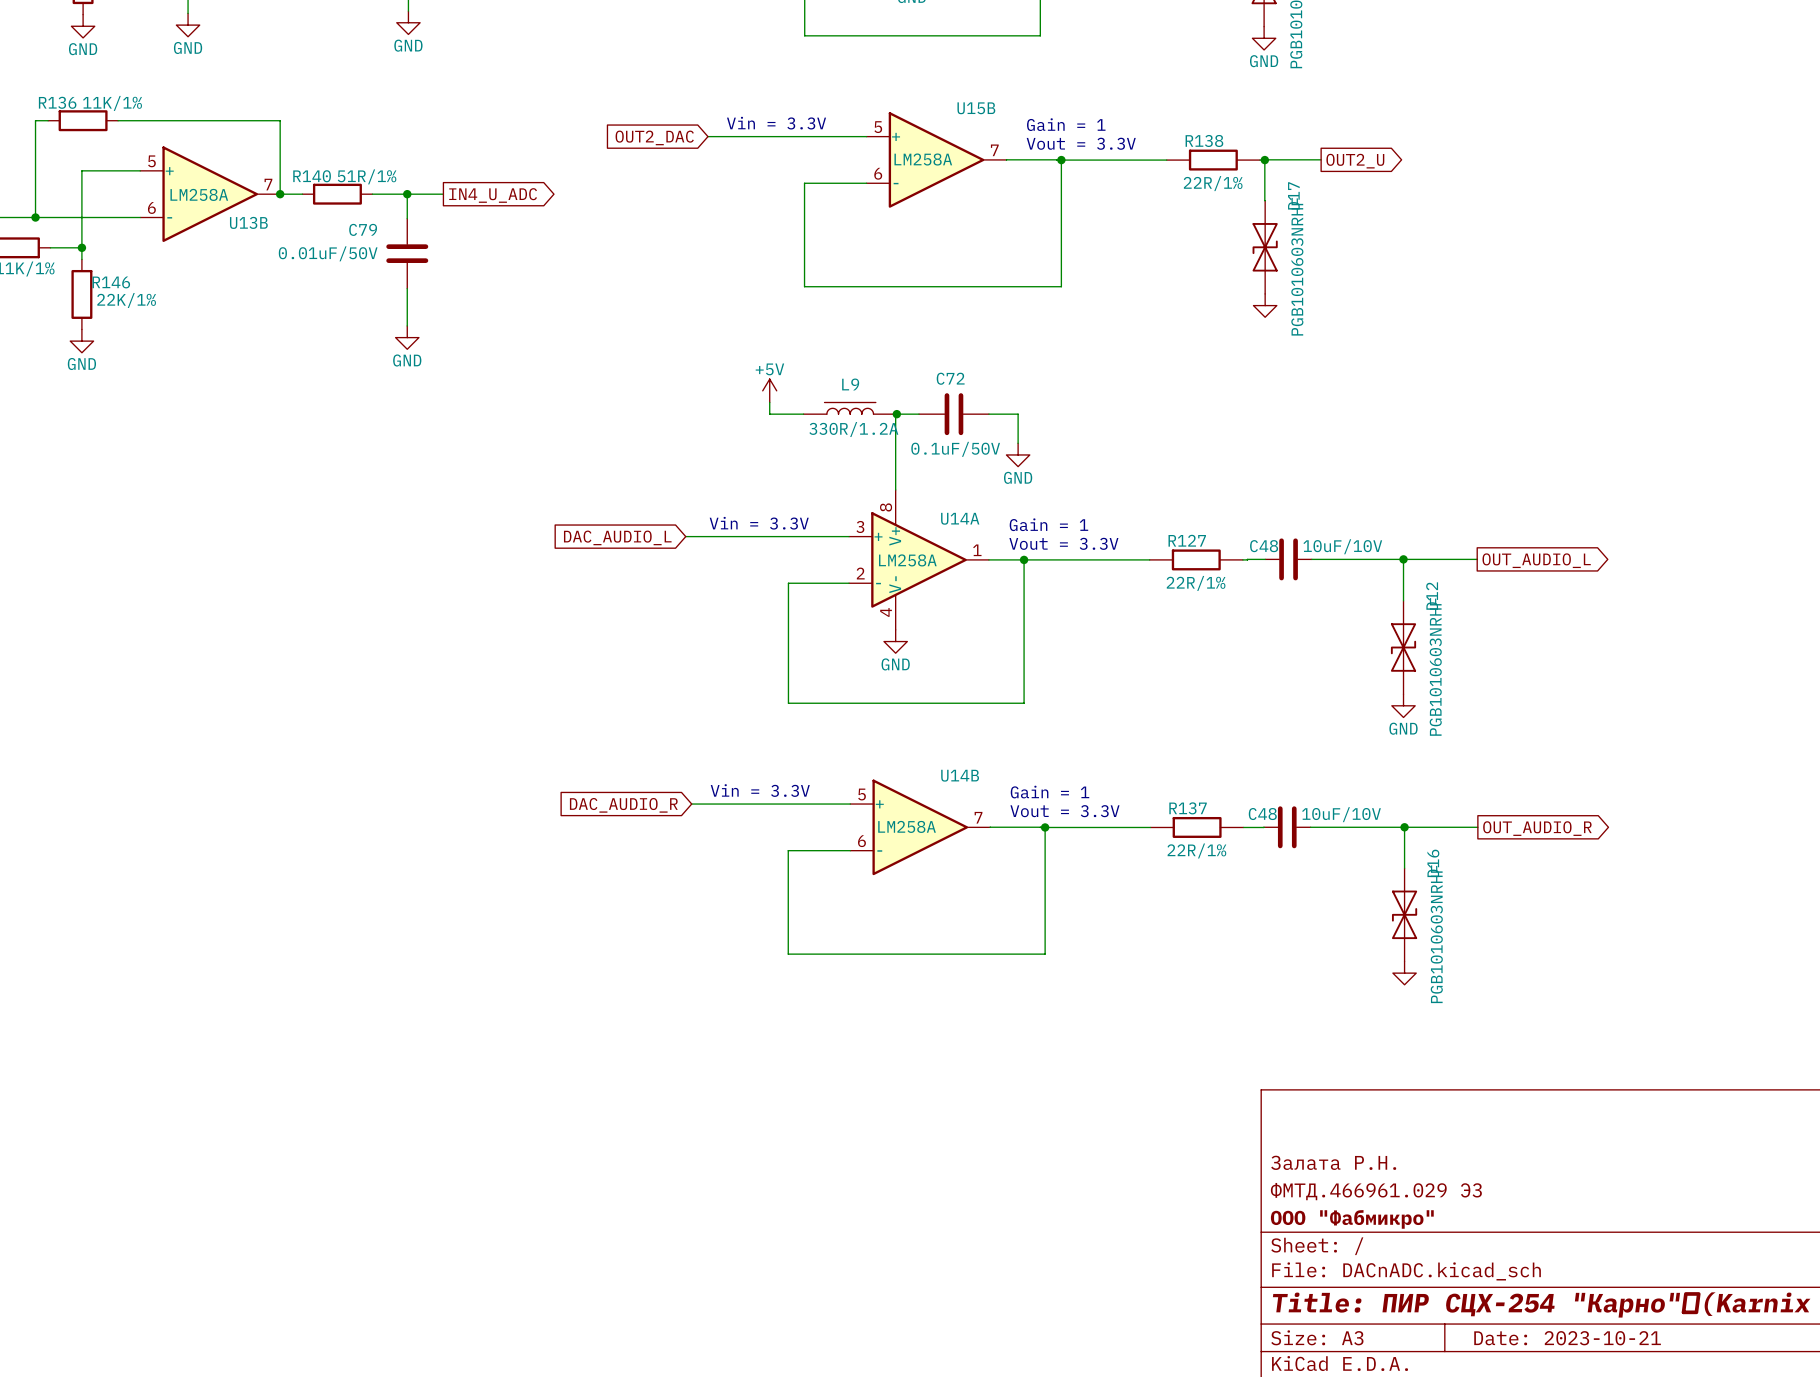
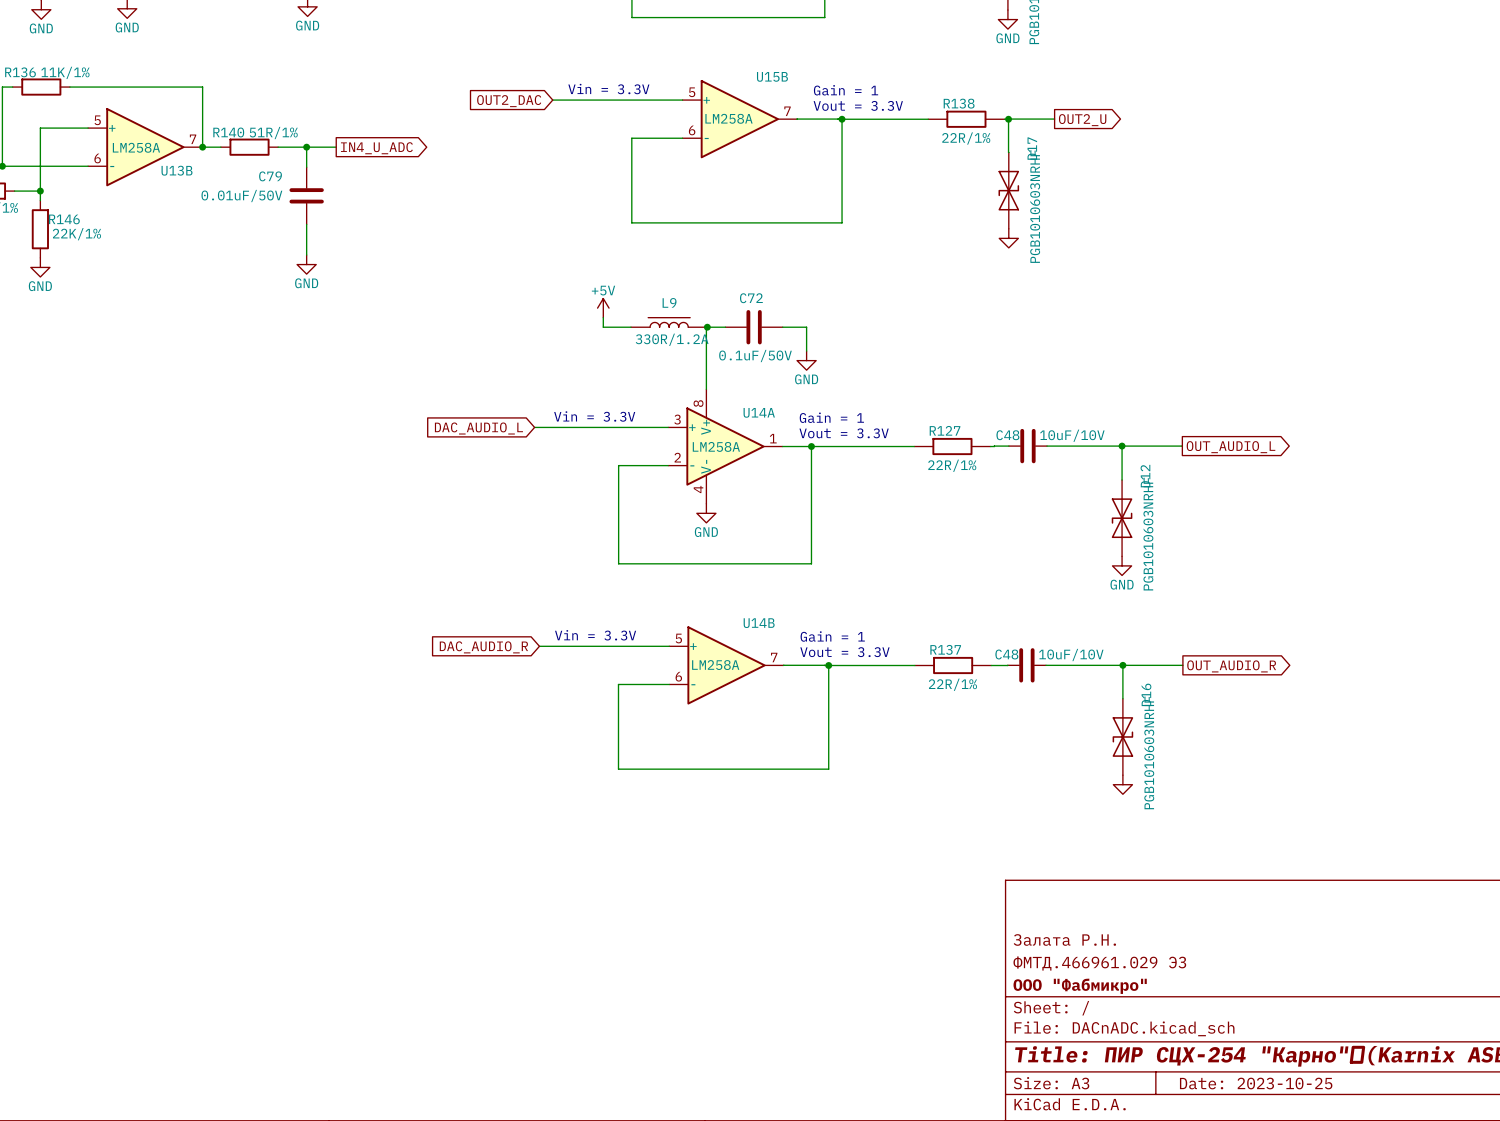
title block: Date: 2023-10-21 (1567, 1338) -> Date: 2023-10-25 (1256, 1083)

